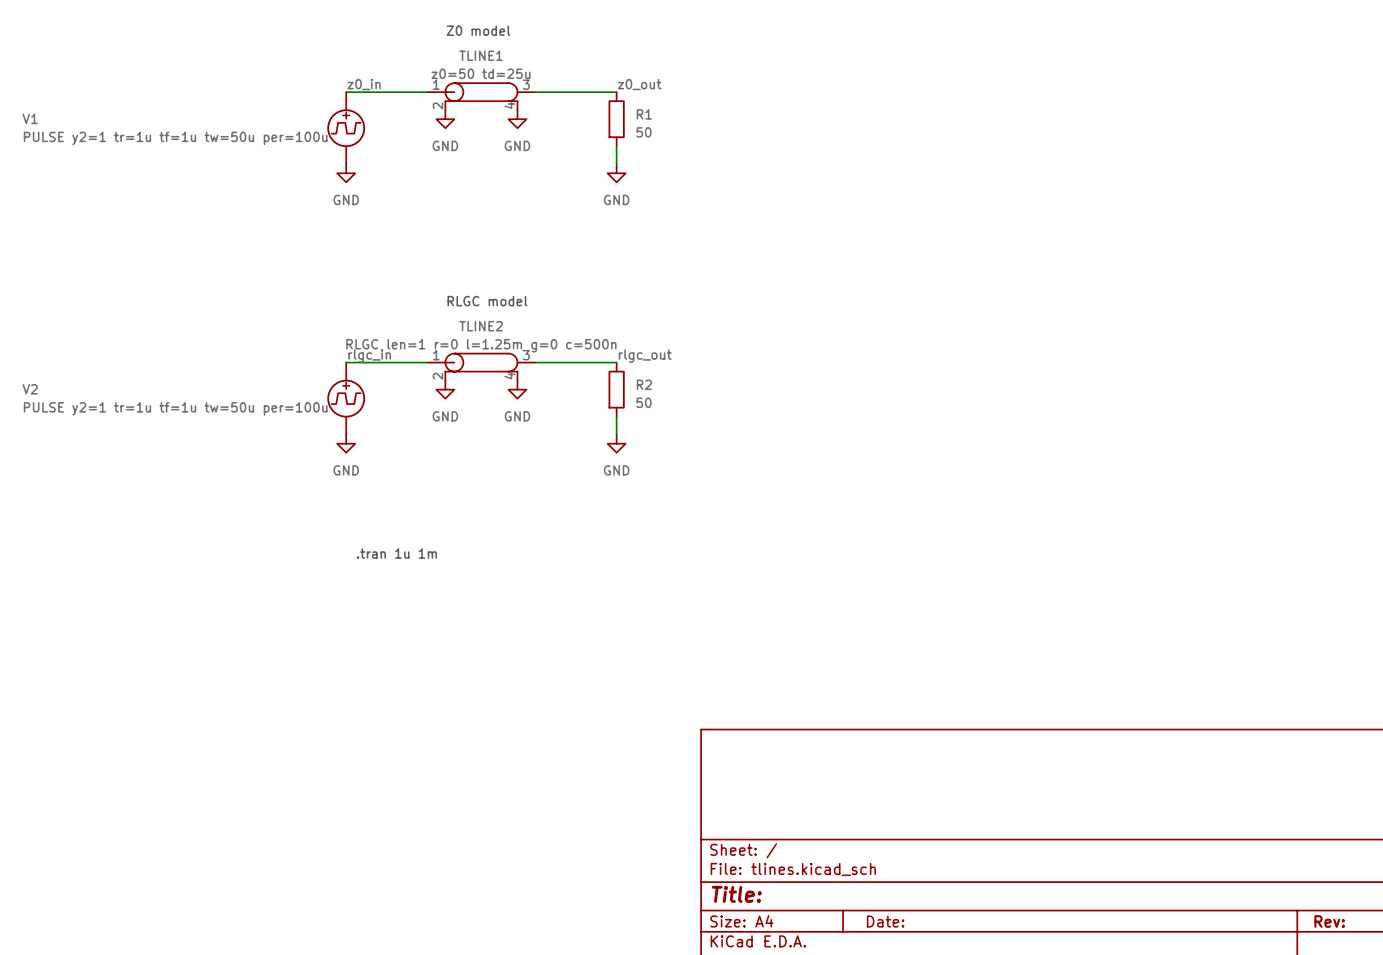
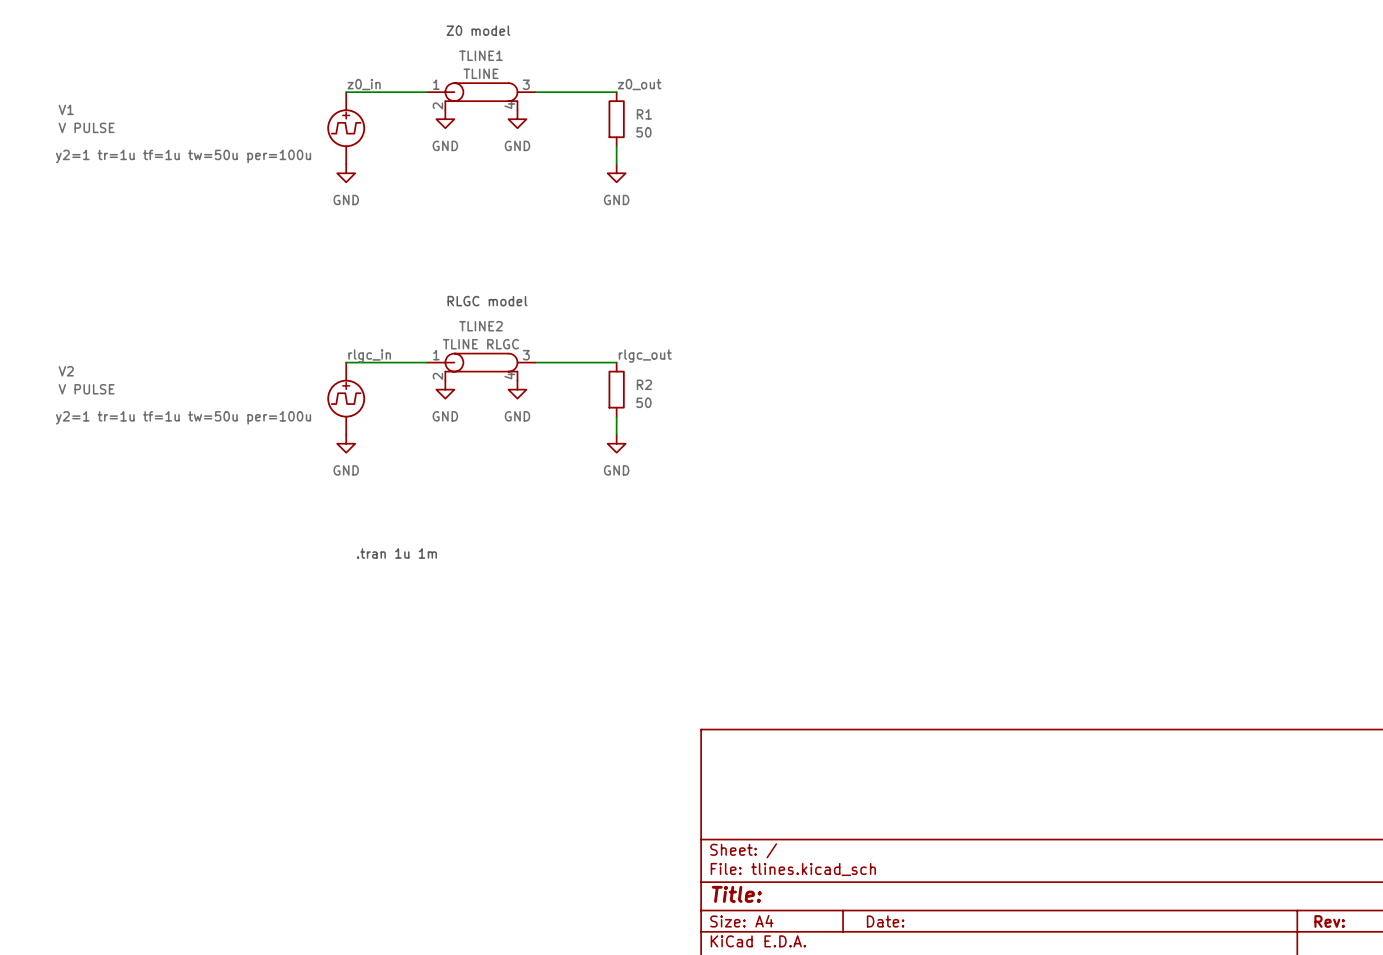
TLINE1 value: z0=50 td=25u (481, 73) -> TLINE (481, 73)
V1 name position: V1 (30, 118) -> V1 (66, 109)
V1 value: PULSE y2=1 tr=1u tf=1u tw=50u per=100u (175, 138) -> V PULSE (86, 127)
V1 text: none -> y2=1 tr=1u tf=1u tw=50u per=100u (183, 156)
TLINE2 value: RLGC len=1 r=0 l=1.25m g=0 c=500n (481, 345) -> TLINE RLGC (481, 344)
V2 name position: V2 (30, 389) -> V2 (66, 371)
V2 value: PULSE y2=1 tr=1u tf=1u tw=50u per=100u (175, 408) -> V PULSE (86, 389)
V2 text: none -> y2=1 tr=1u tf=1u tw=50u per=100u (183, 417)

